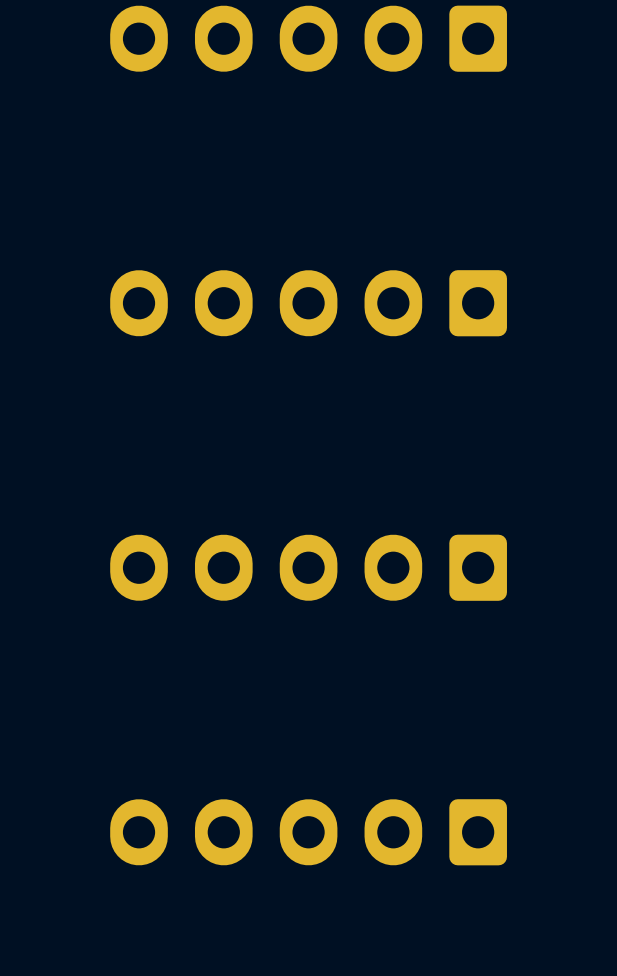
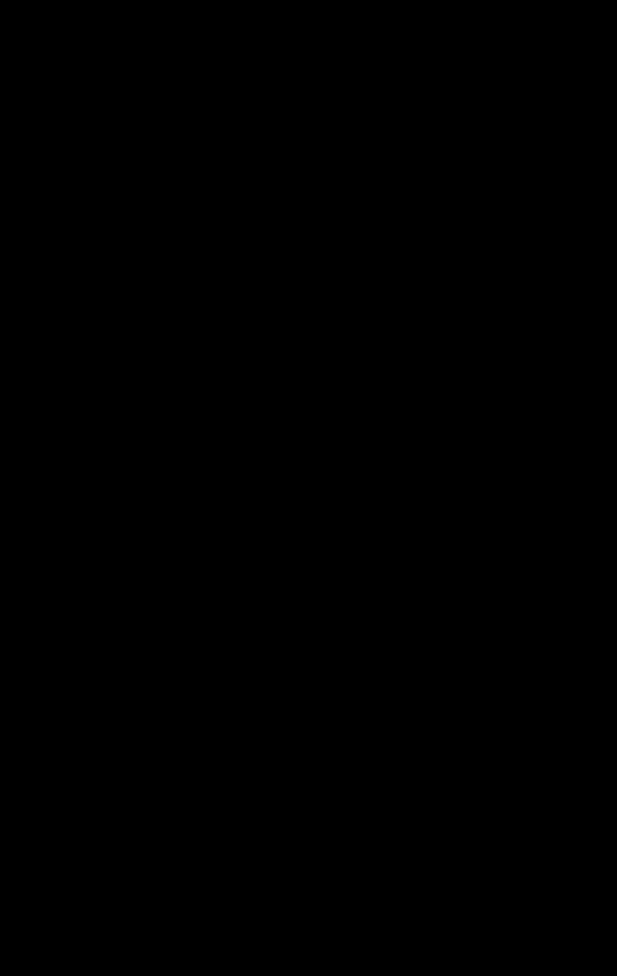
part: (308, 38) -> none
part: (308, 303) -> none
part: (308, 567) -> none
part: (308, 832) -> none

